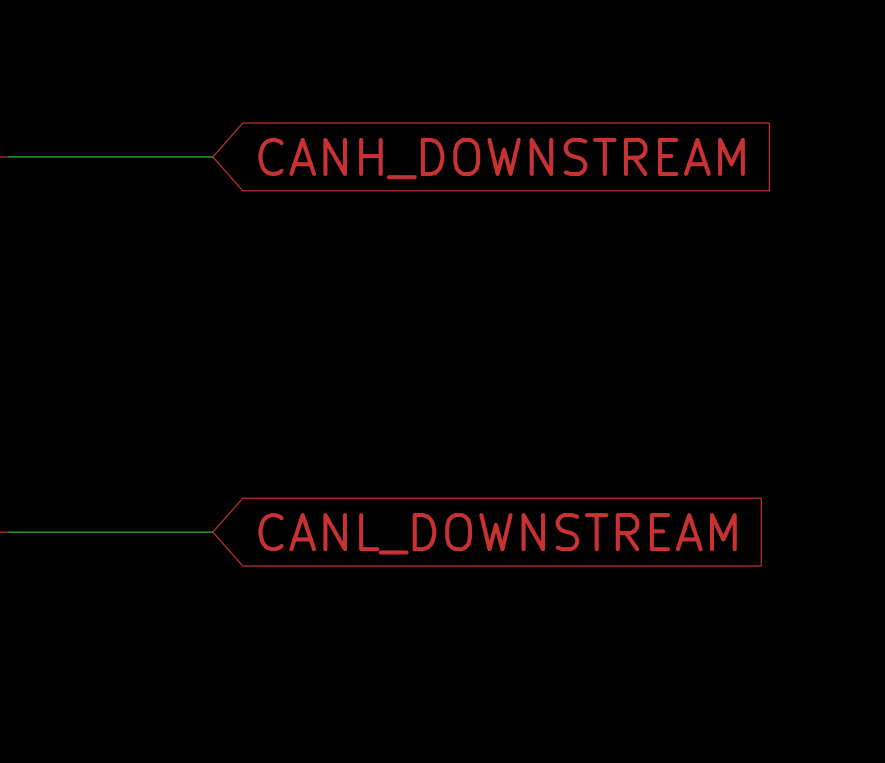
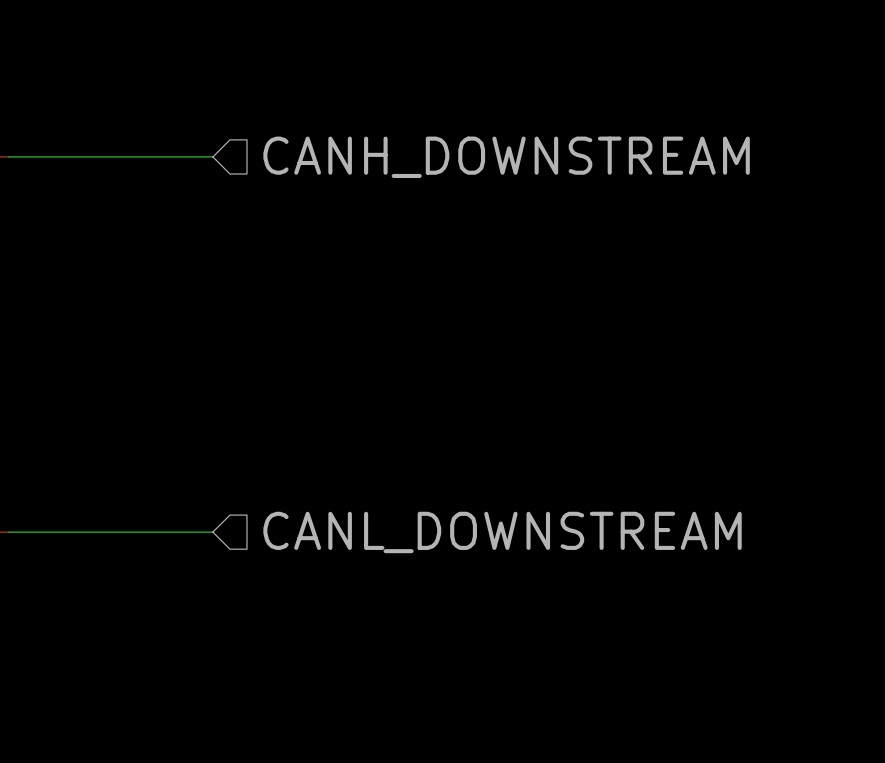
hierarchical label: none -> CANH_DOWNSTREAM (506, 157)
global label: CANH_DOWNSTREAM (501, 158) -> none
hierarchical label: none -> CANL_DOWNSTREAM (502, 532)
global label: CANL_DOWNSTREAM (497, 533) -> none

